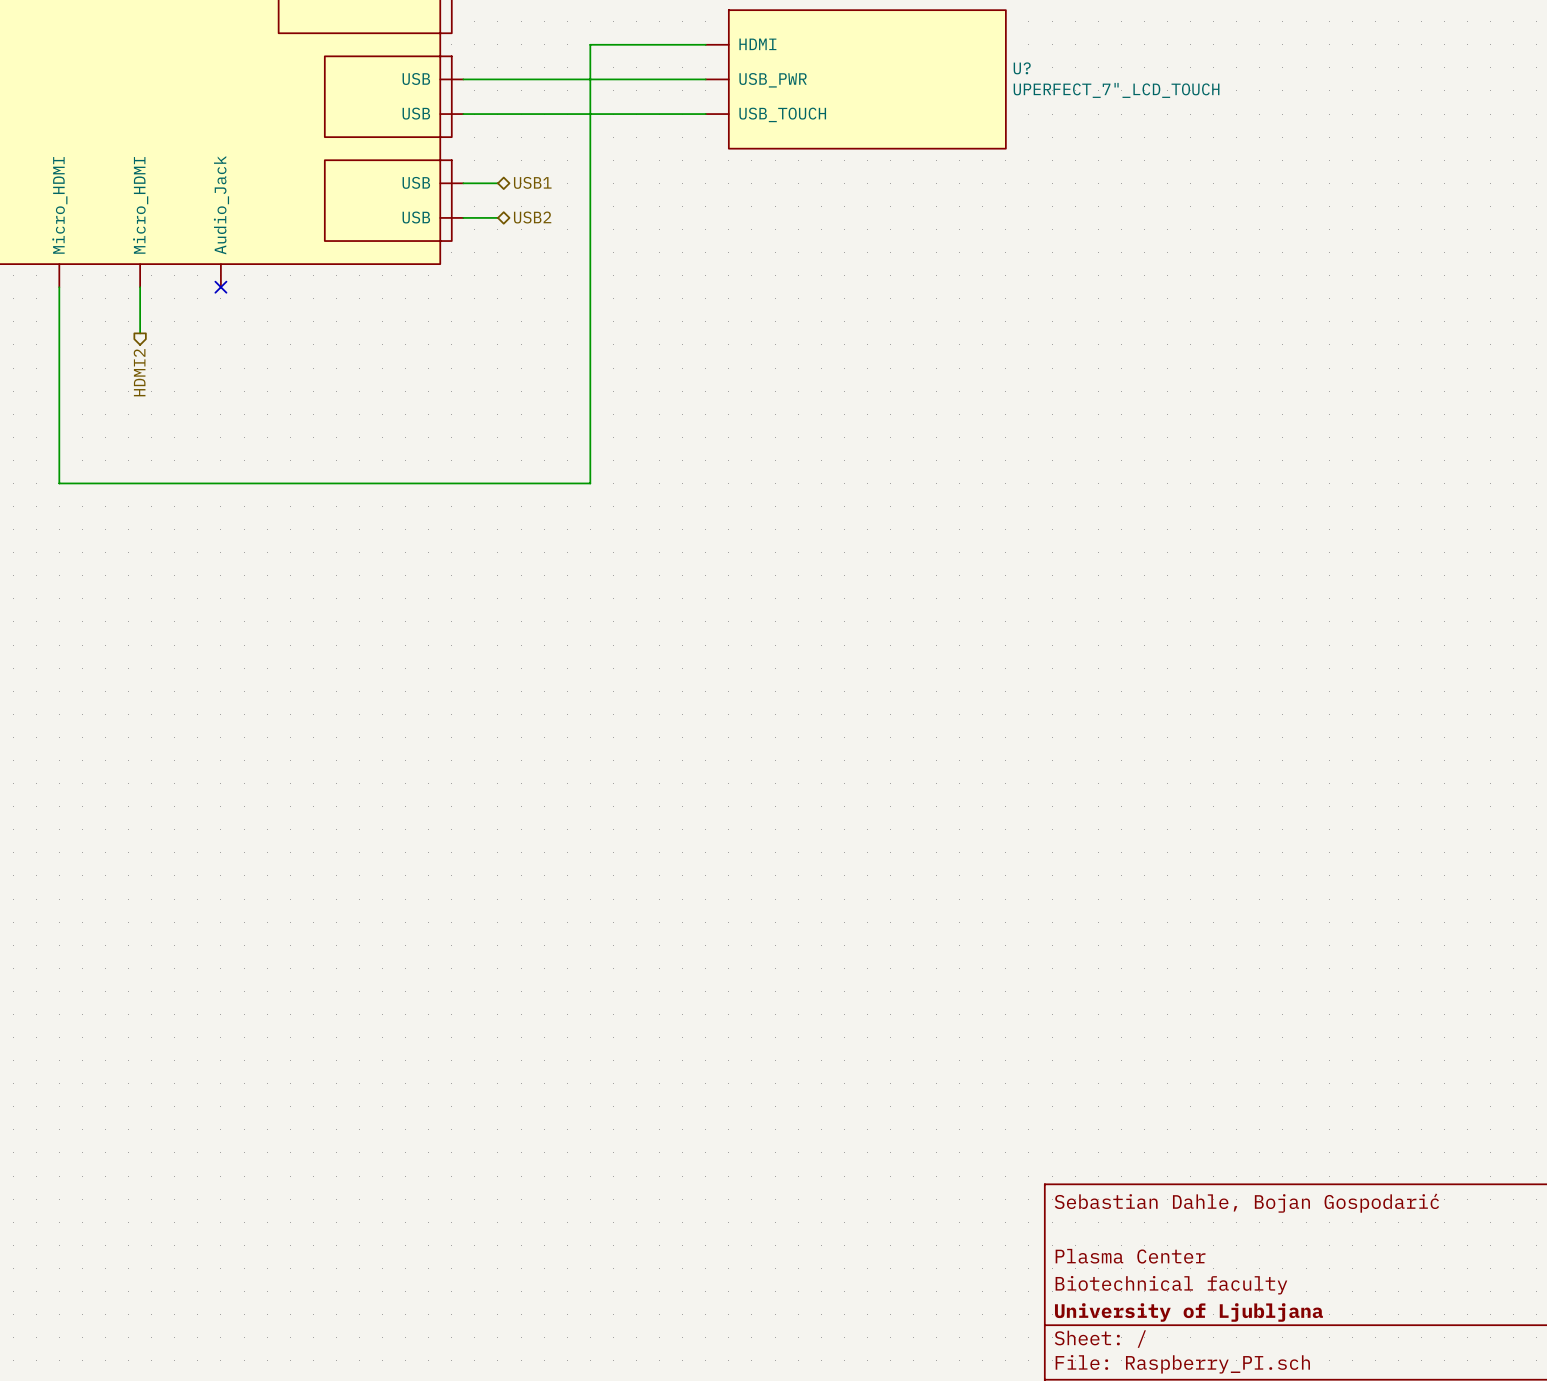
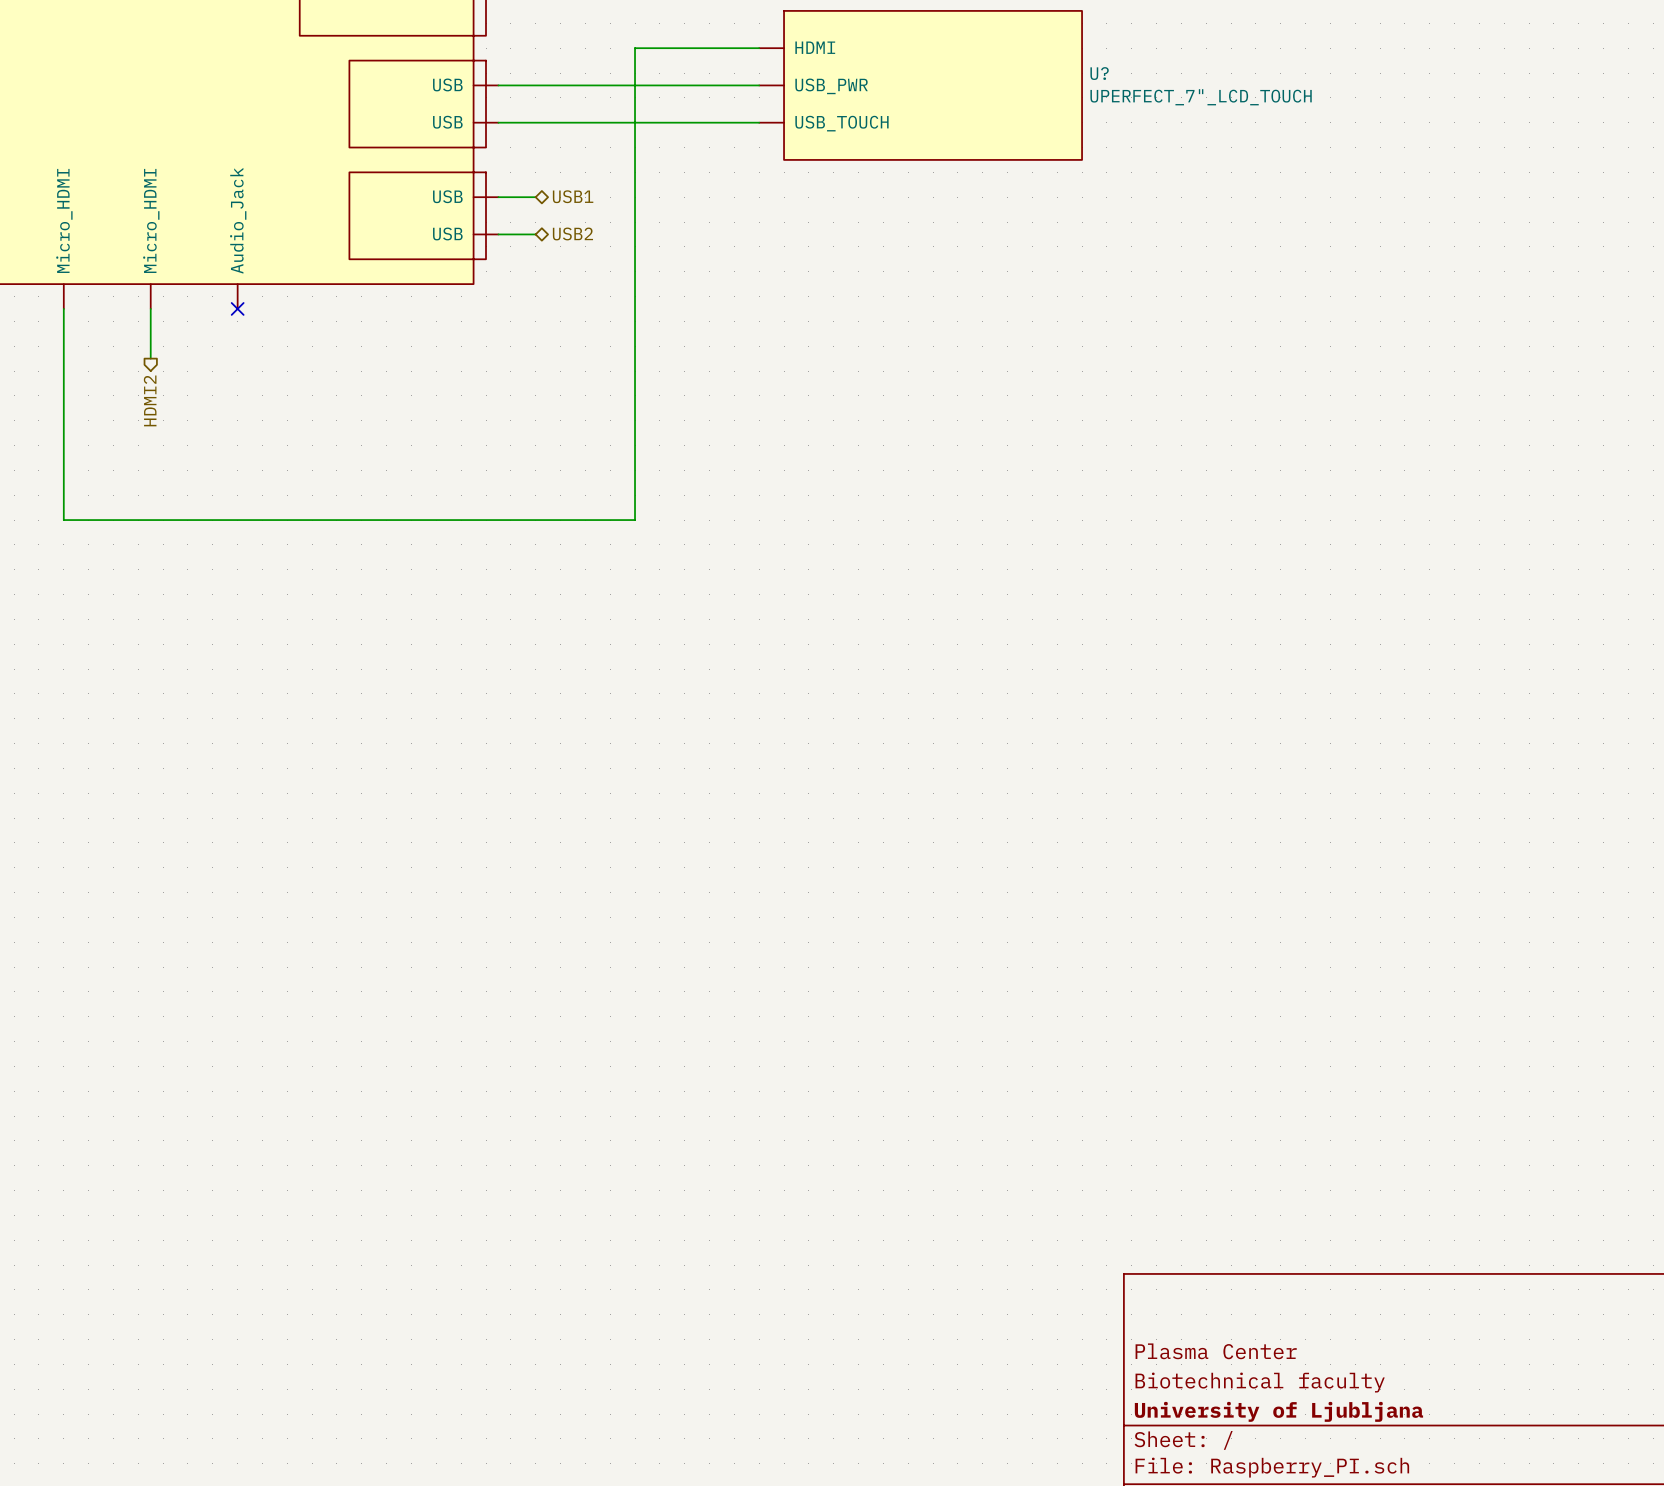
title block: Sebastian Dahle, Bojan Gospodarić (1246, 1203) -> none

